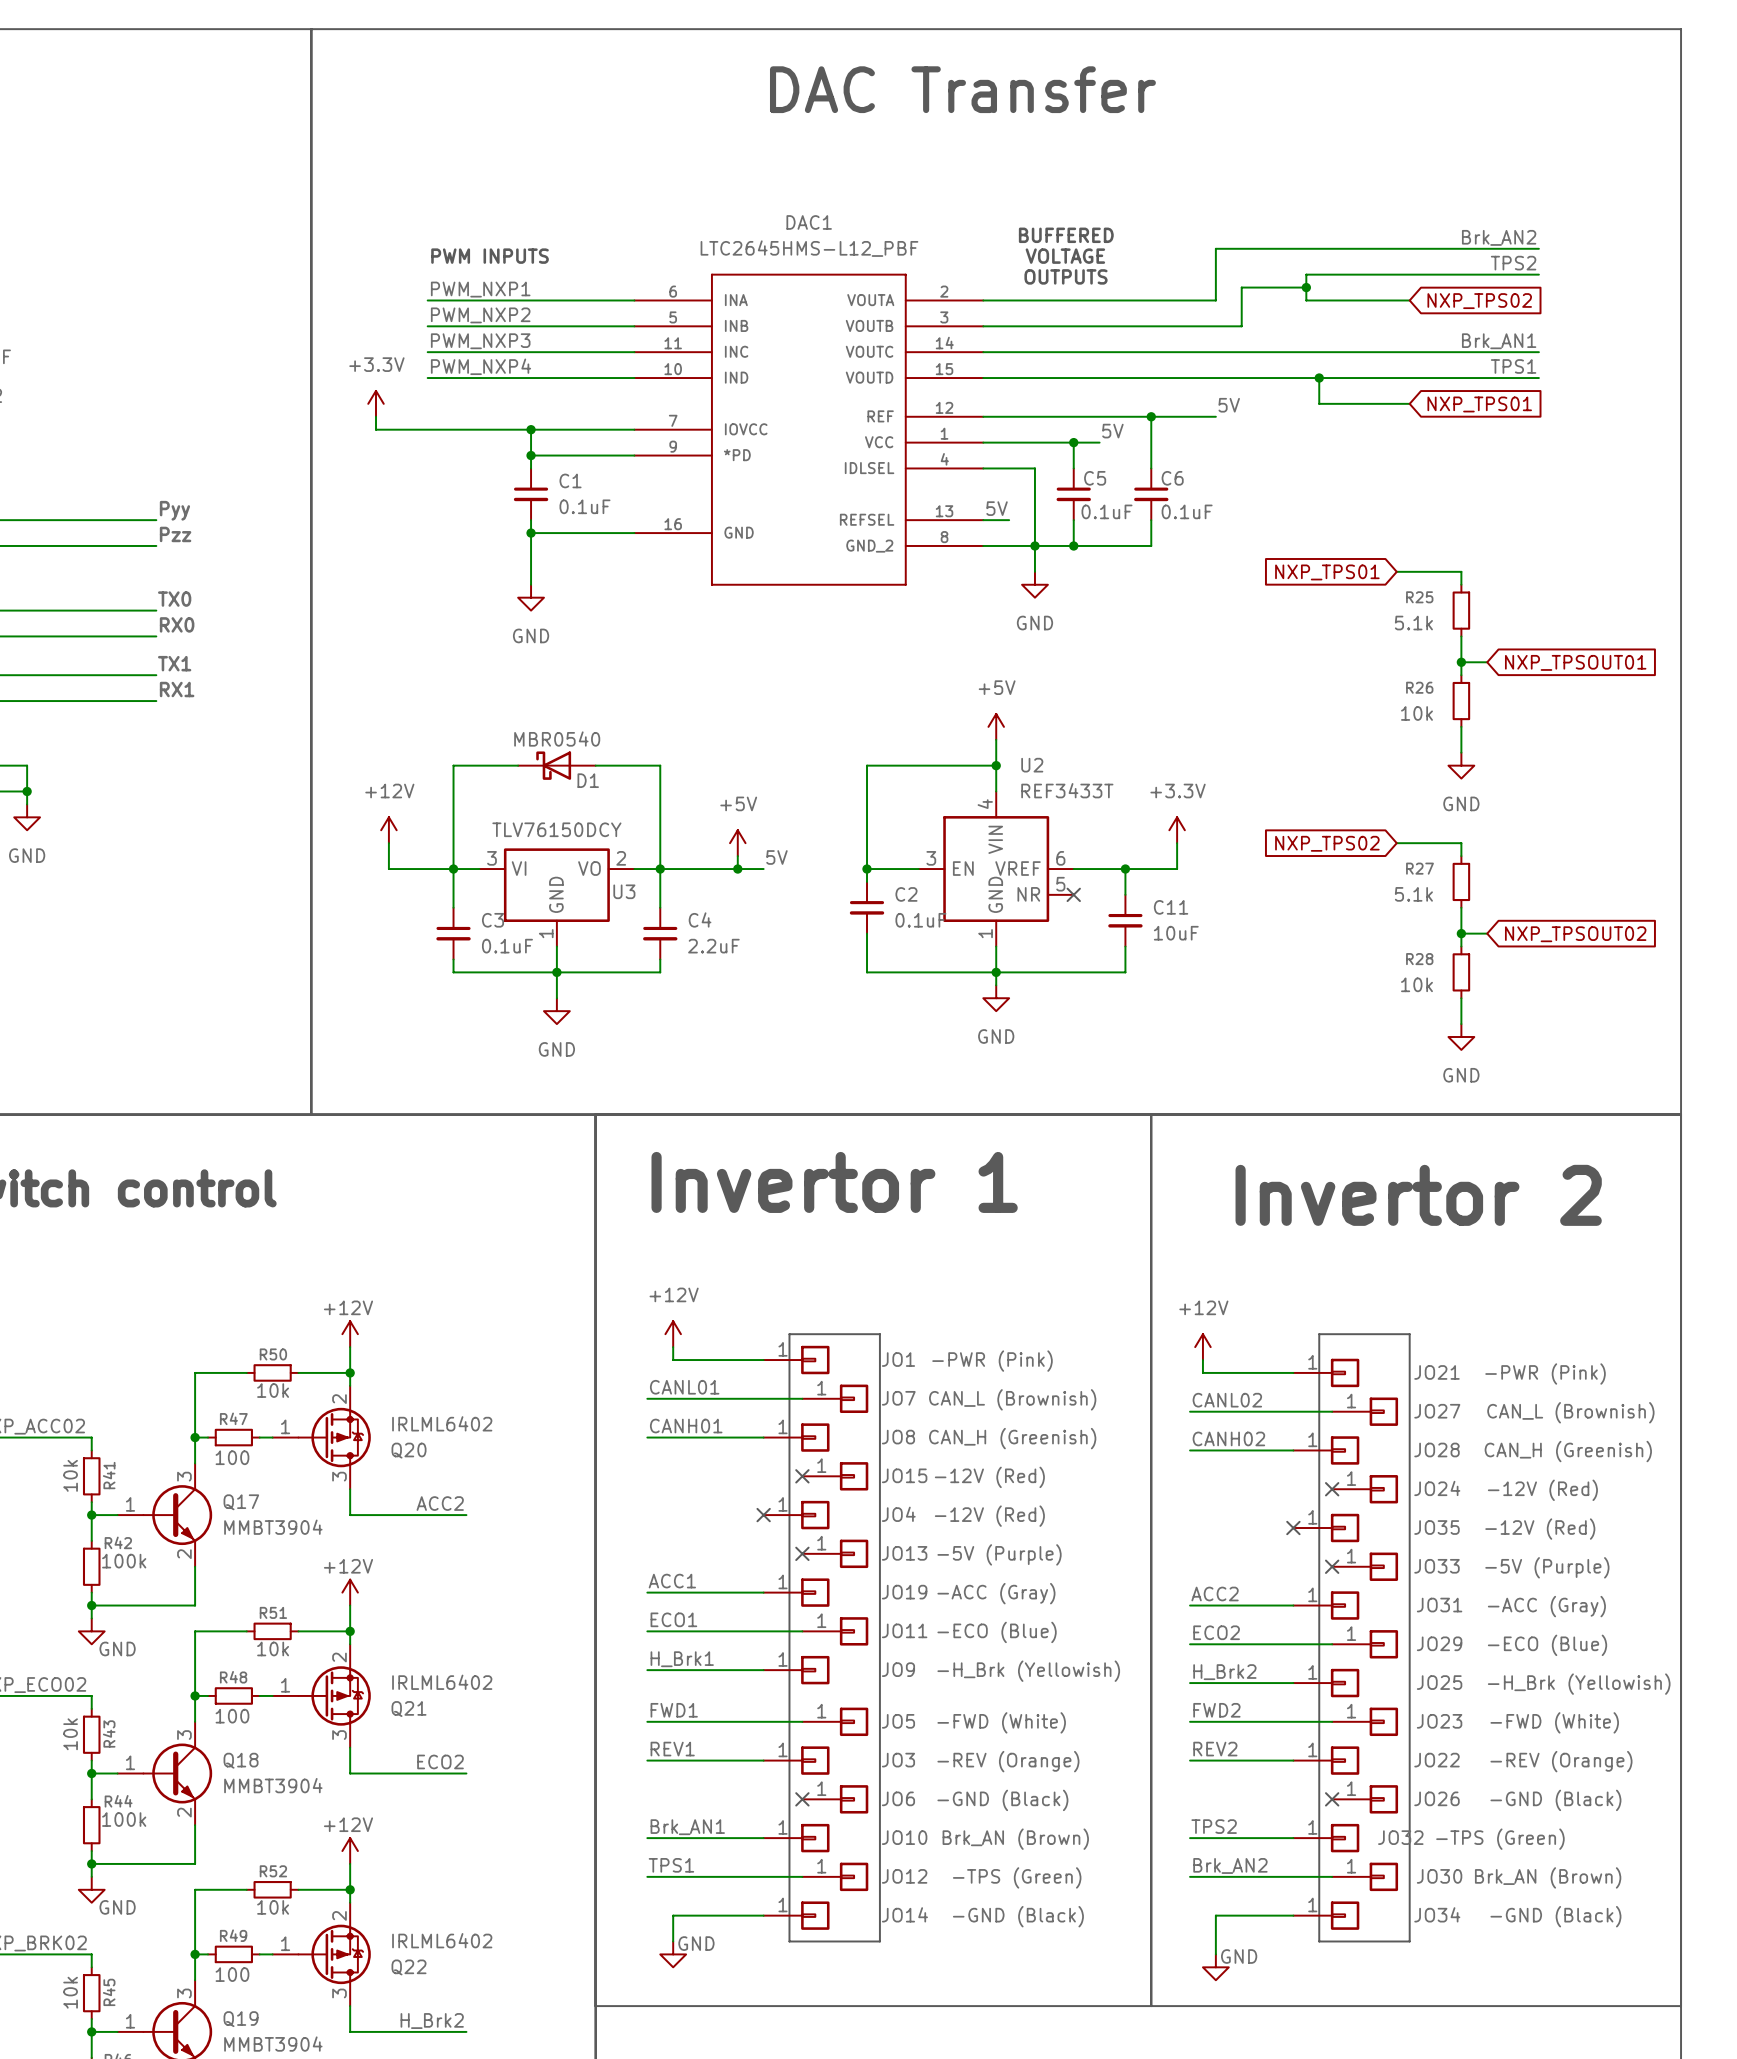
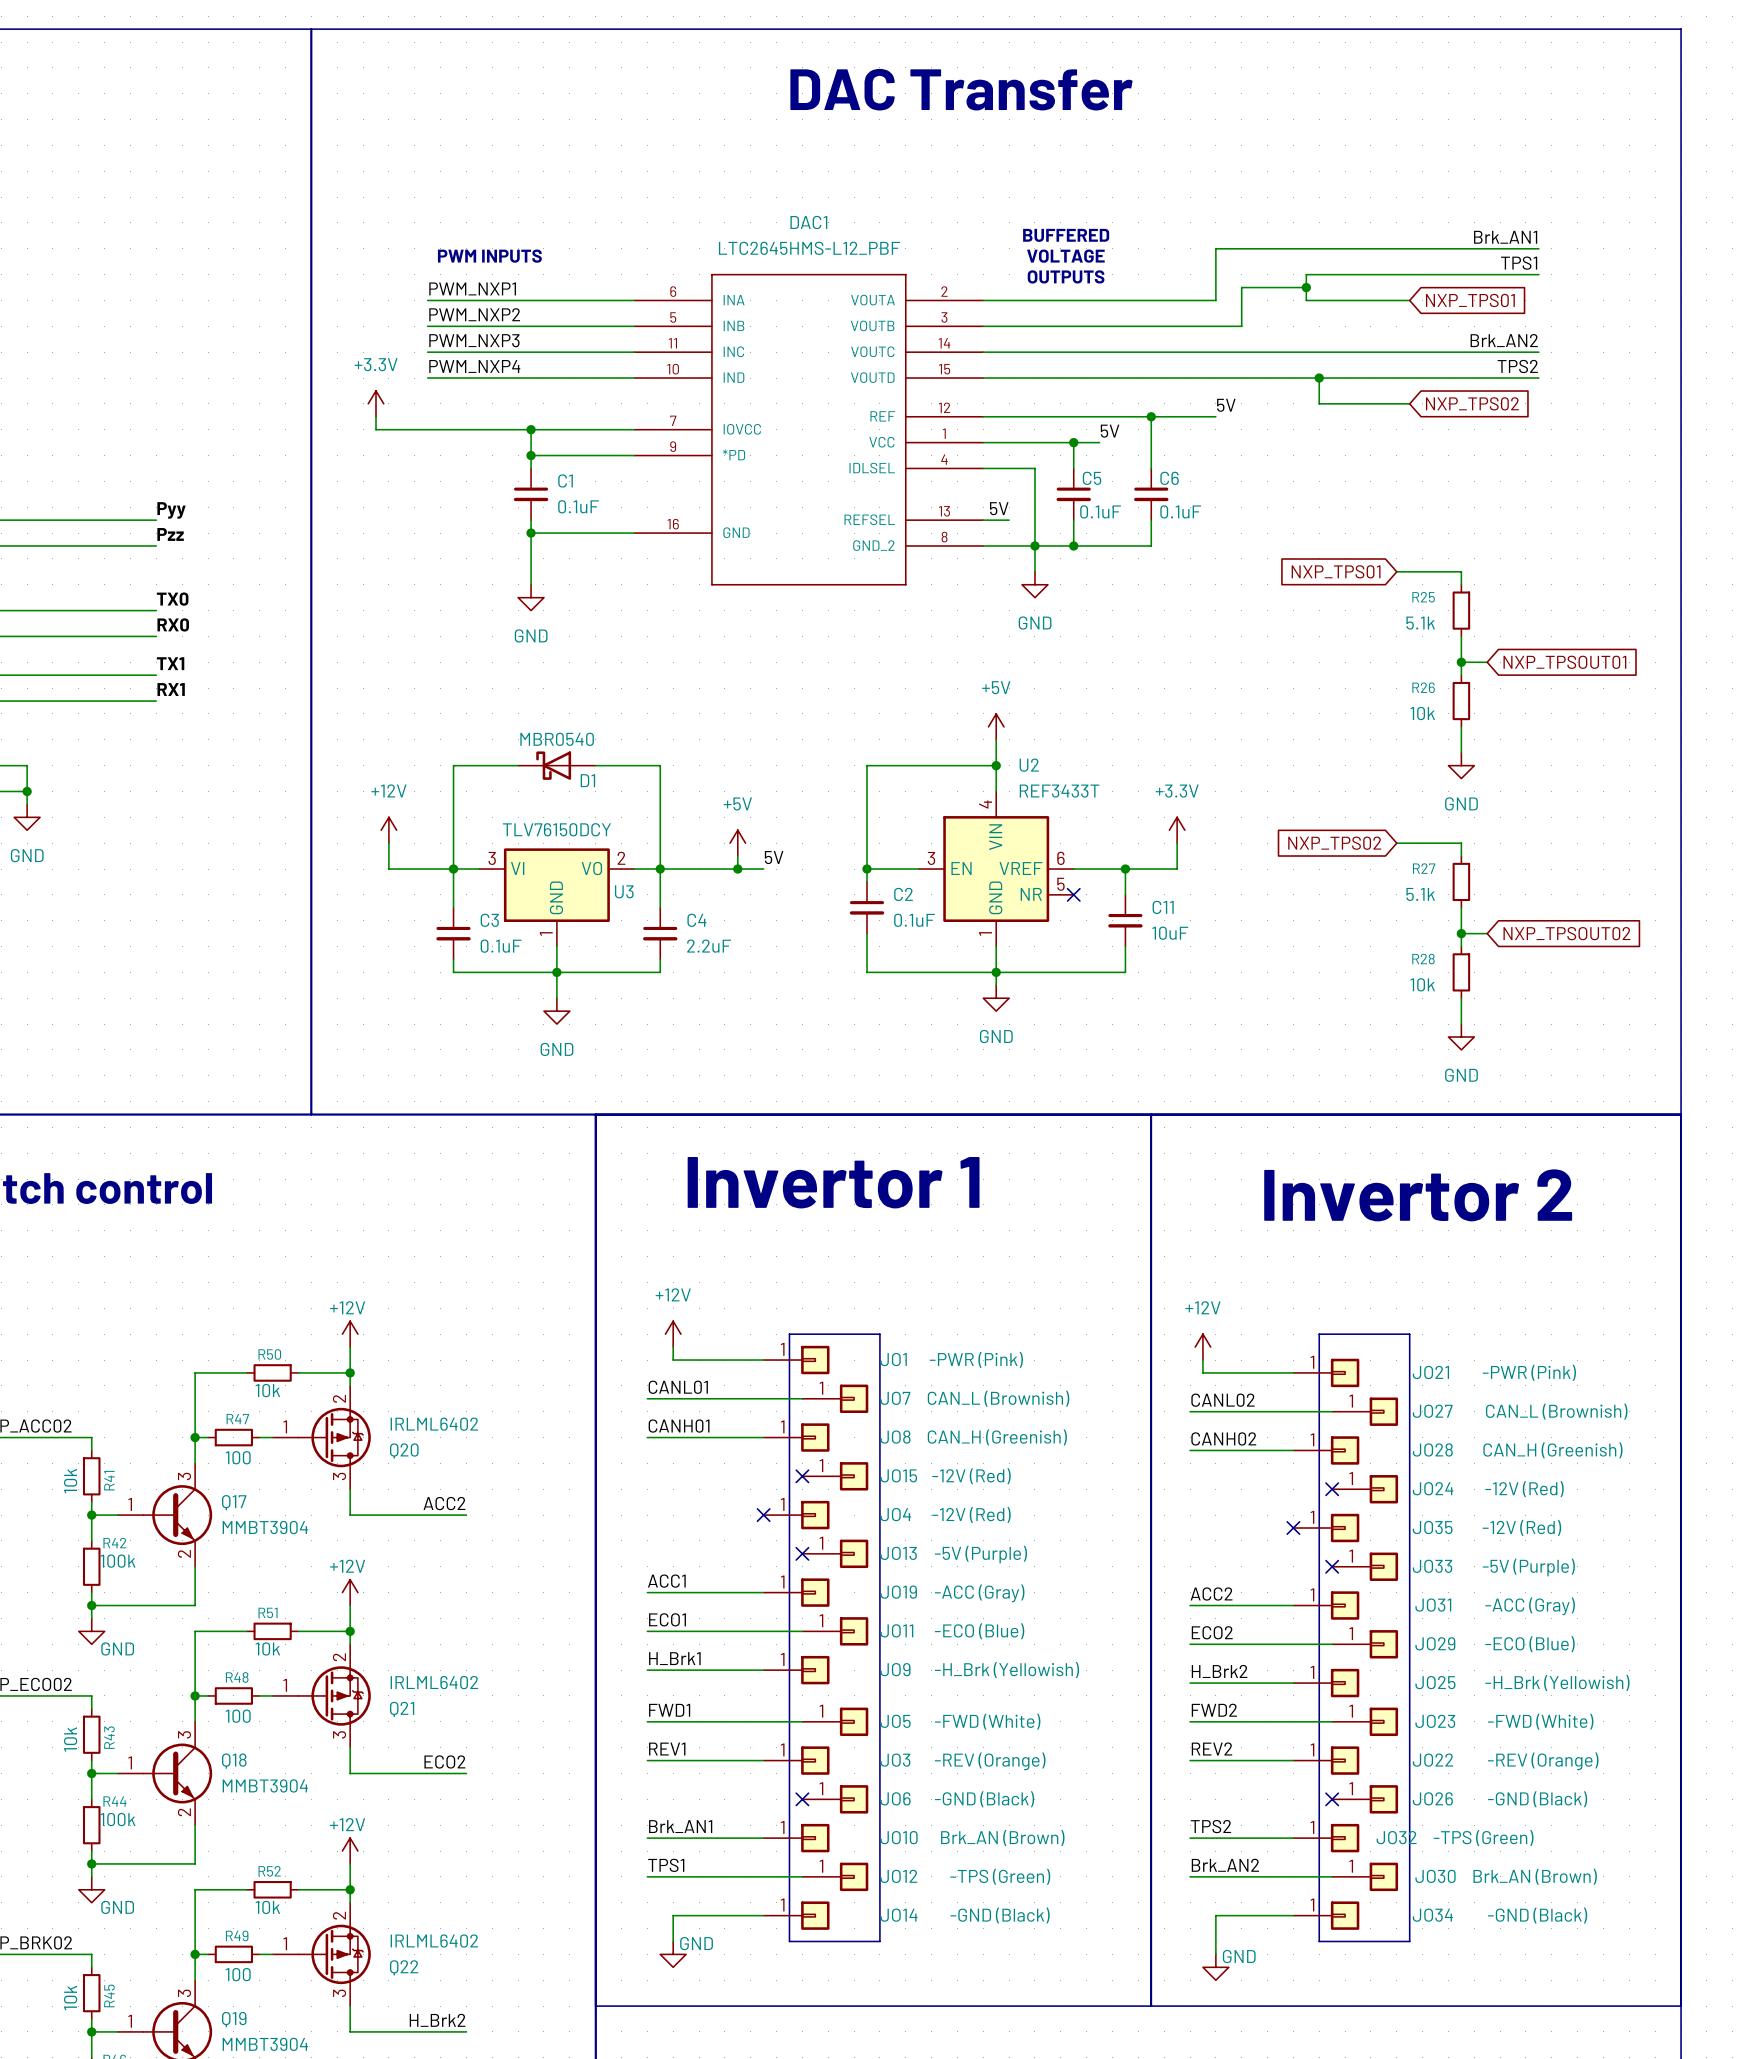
label: Brk_AN2 (1499, 237) -> Brk_AN1 (1505, 237)
label: TPS2 (1513, 263) -> TPS1 (1519, 263)
global label: NXP_TPS02 (1479, 301) -> NXP_TPS01 (1470, 300)
label: Brk_AN1 (1499, 341) -> Brk_AN2 (1504, 340)
label: TPS1 (1513, 366) -> TPS2 (1517, 366)
global label: NXP_TPS01 (1479, 404) -> NXP_TPS02 (1472, 403)

